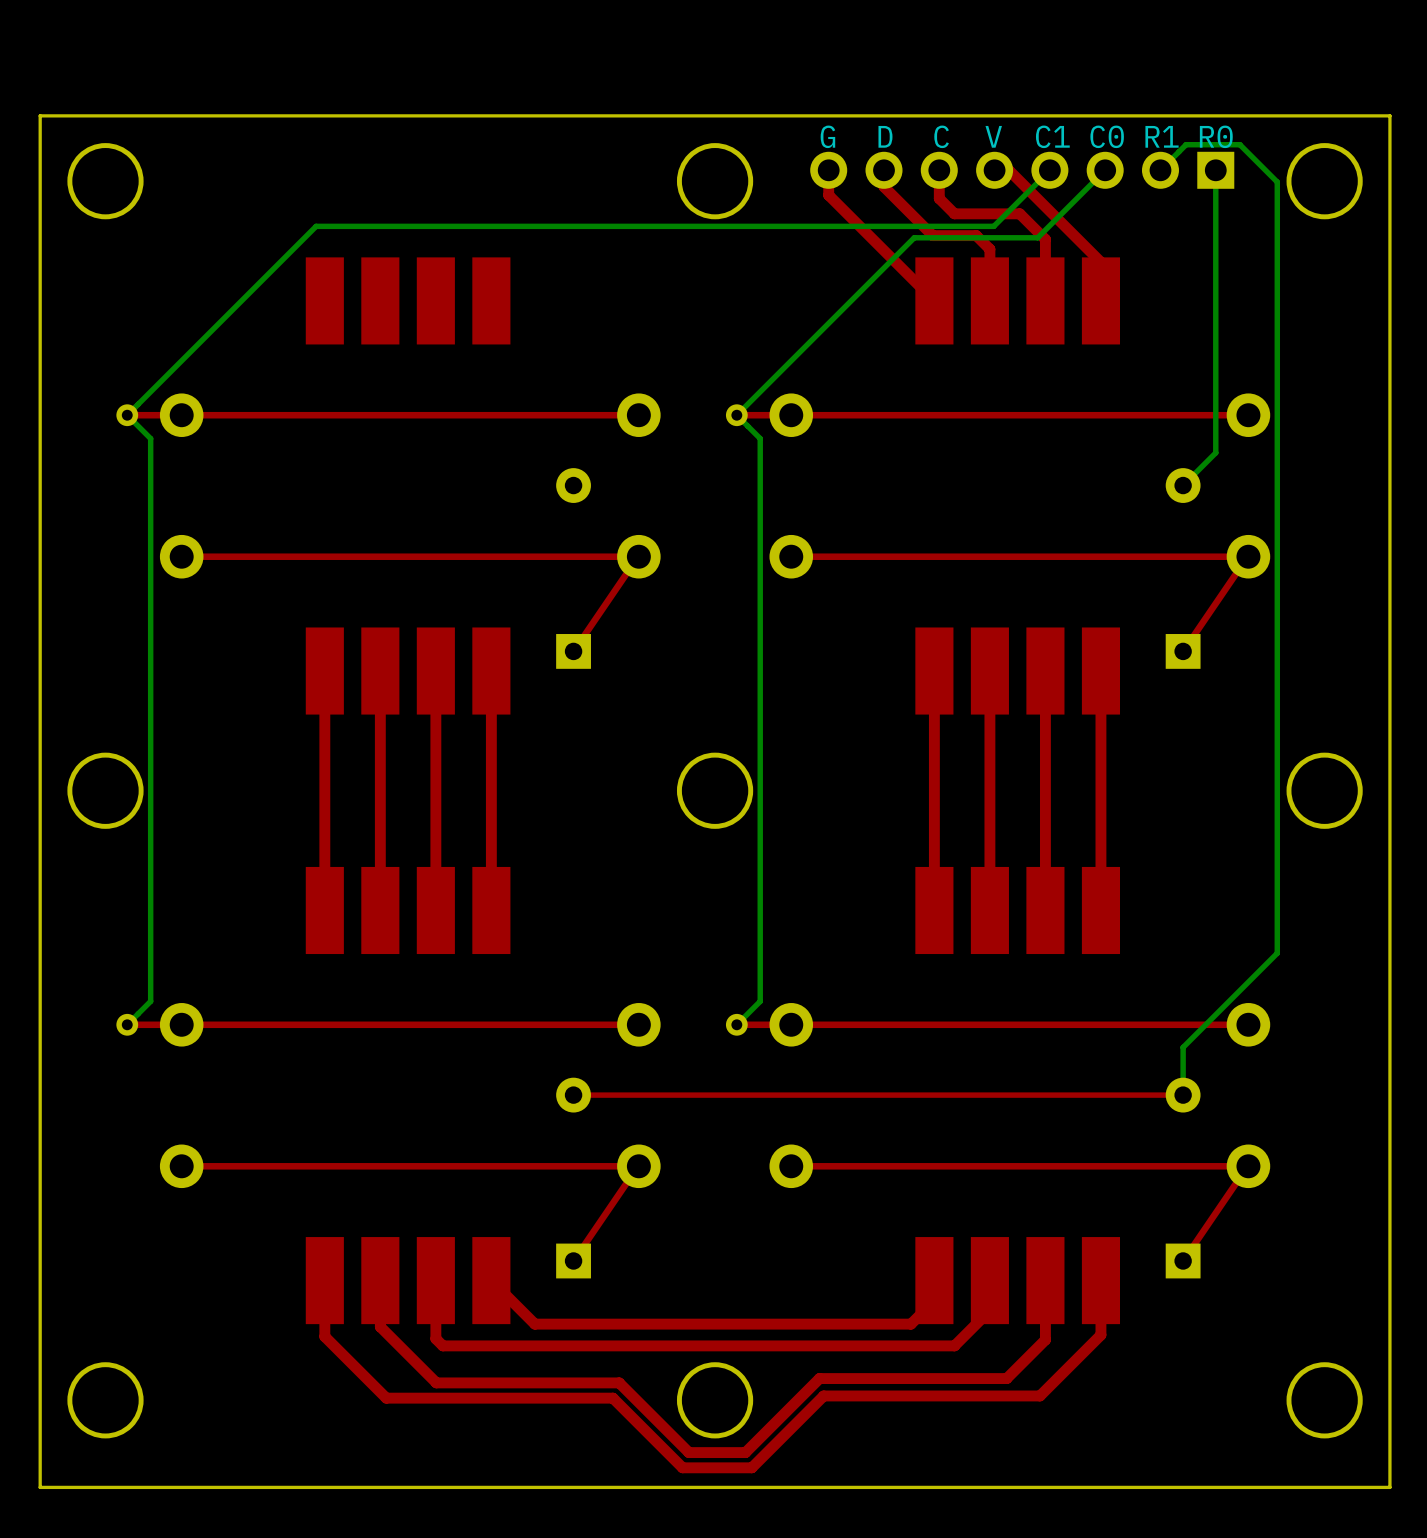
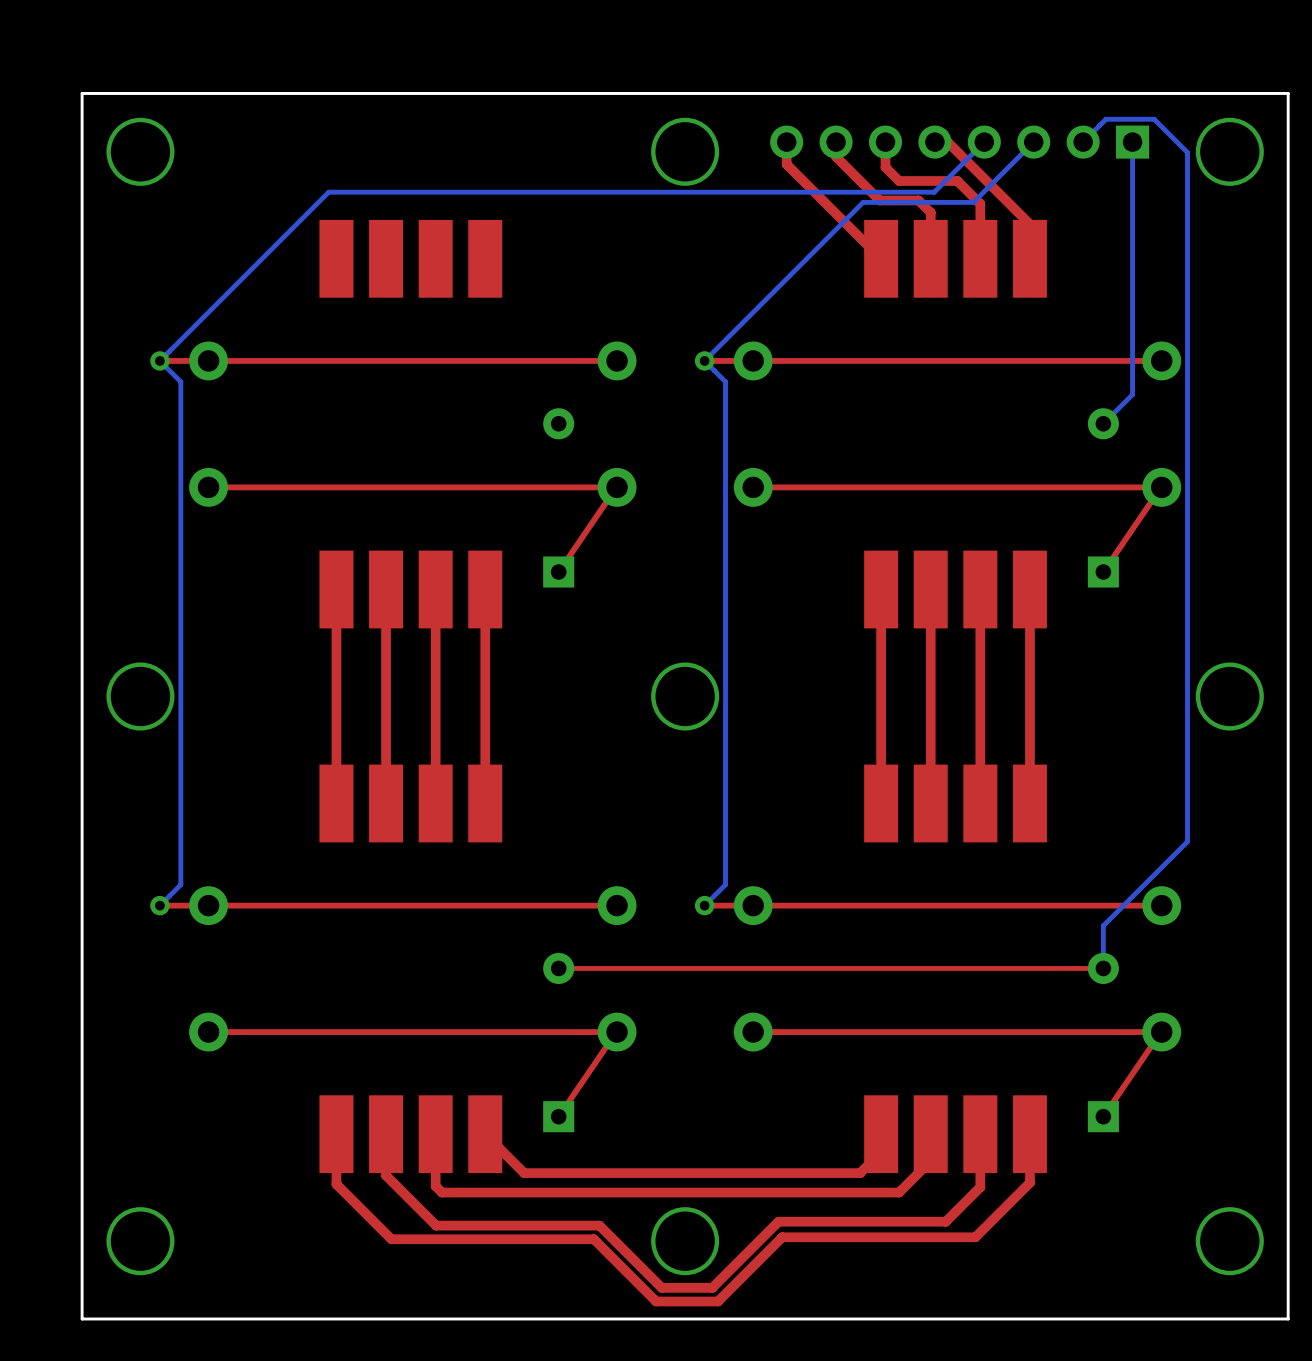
text: G (827, 136) -> none
text: D (885, 136) -> none
text: C (941, 136) -> none
text: V (993, 136) -> none
text: C1 (1052, 136) -> none
text: C0 (1107, 136) -> none
text: R1 (1162, 136) -> none
text: R0 (1216, 136) -> none

